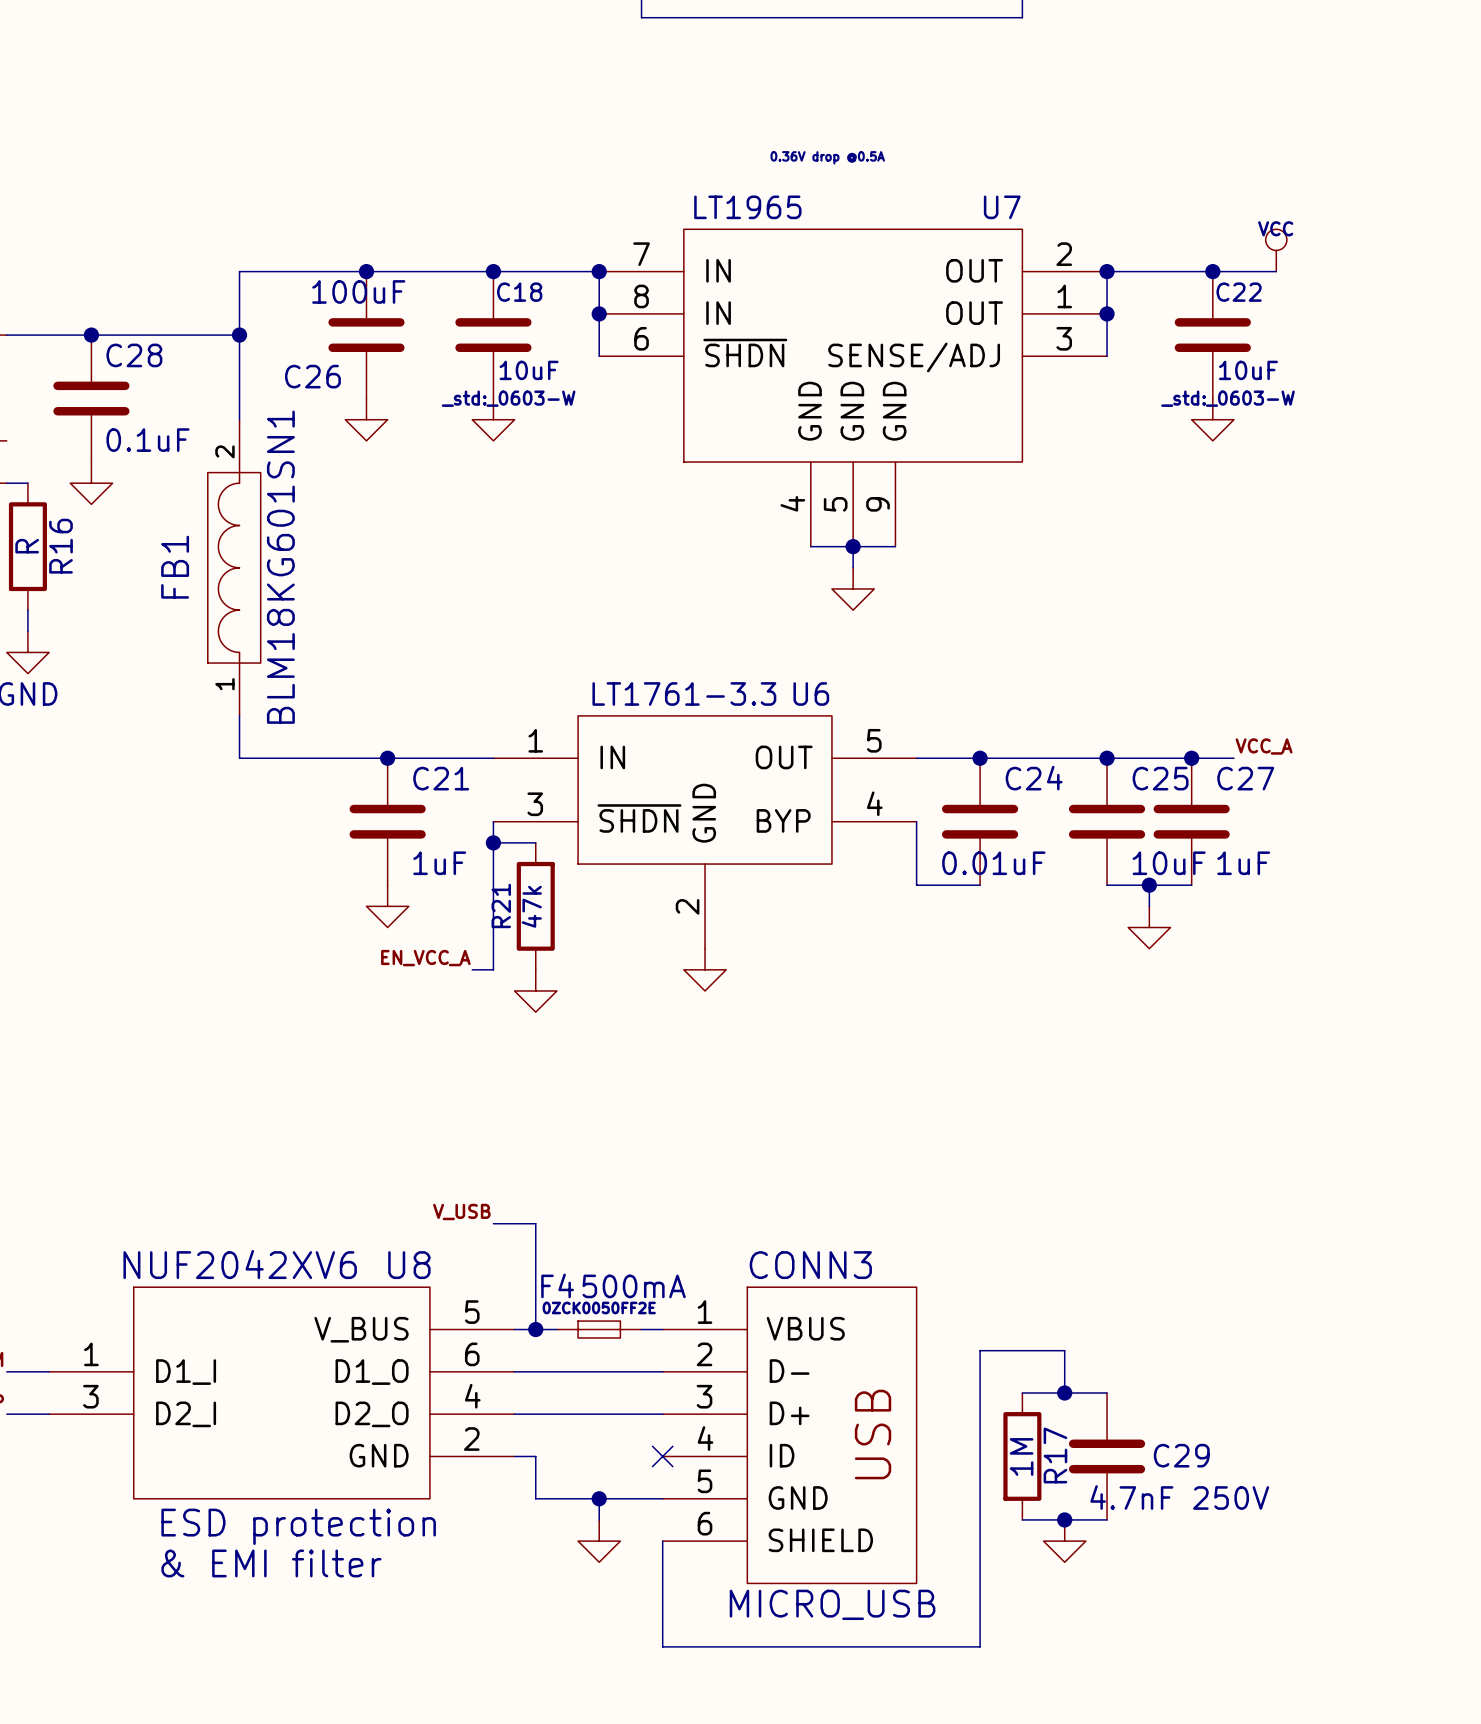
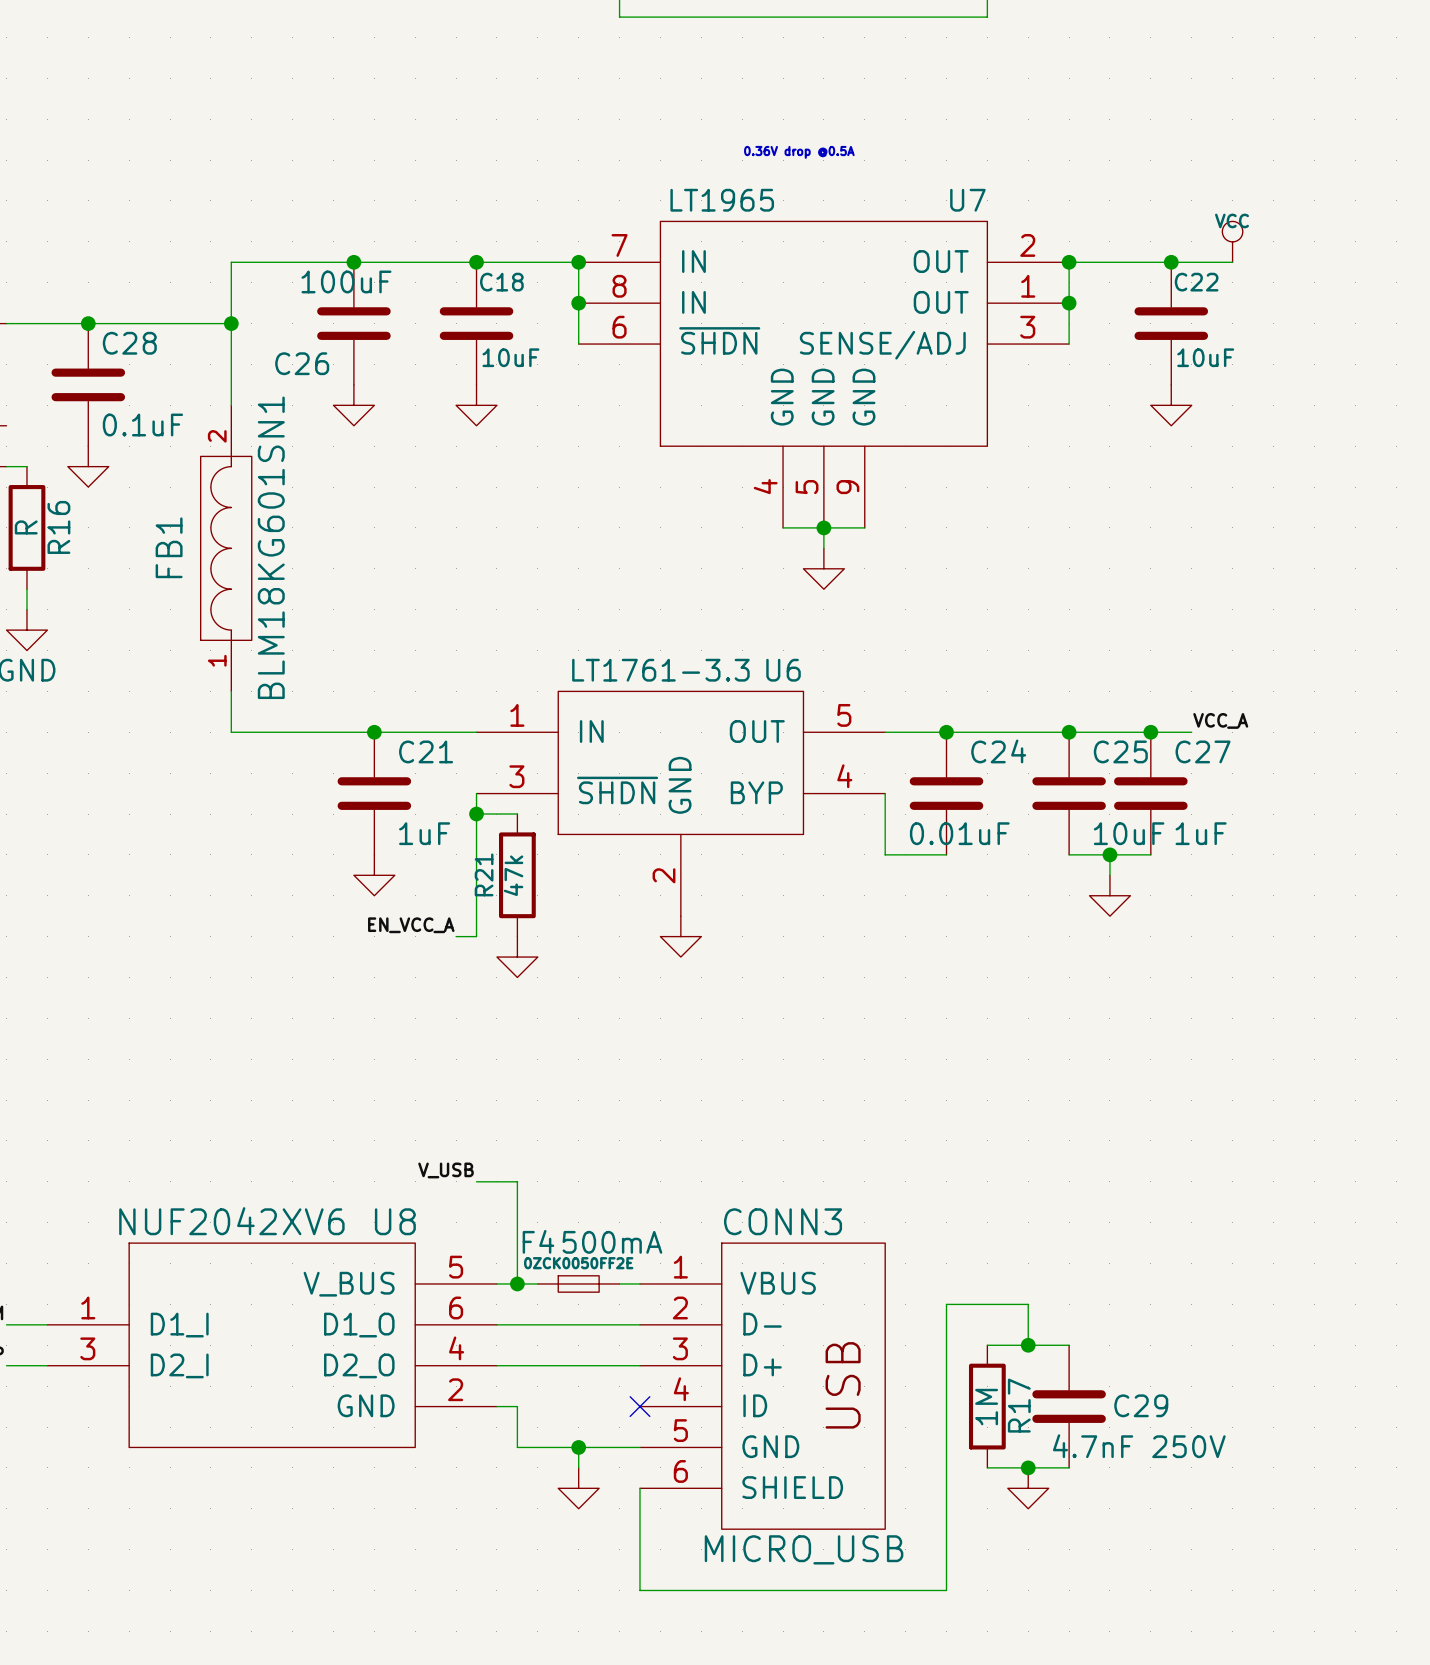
C18 text: _std:_0603-W (508, 398) -> none
C22 text: _std:_0603-W (1227, 398) -> none
text: ESD protection (298, 1526) -> none
text: & EMI filter (271, 1563) -> none

